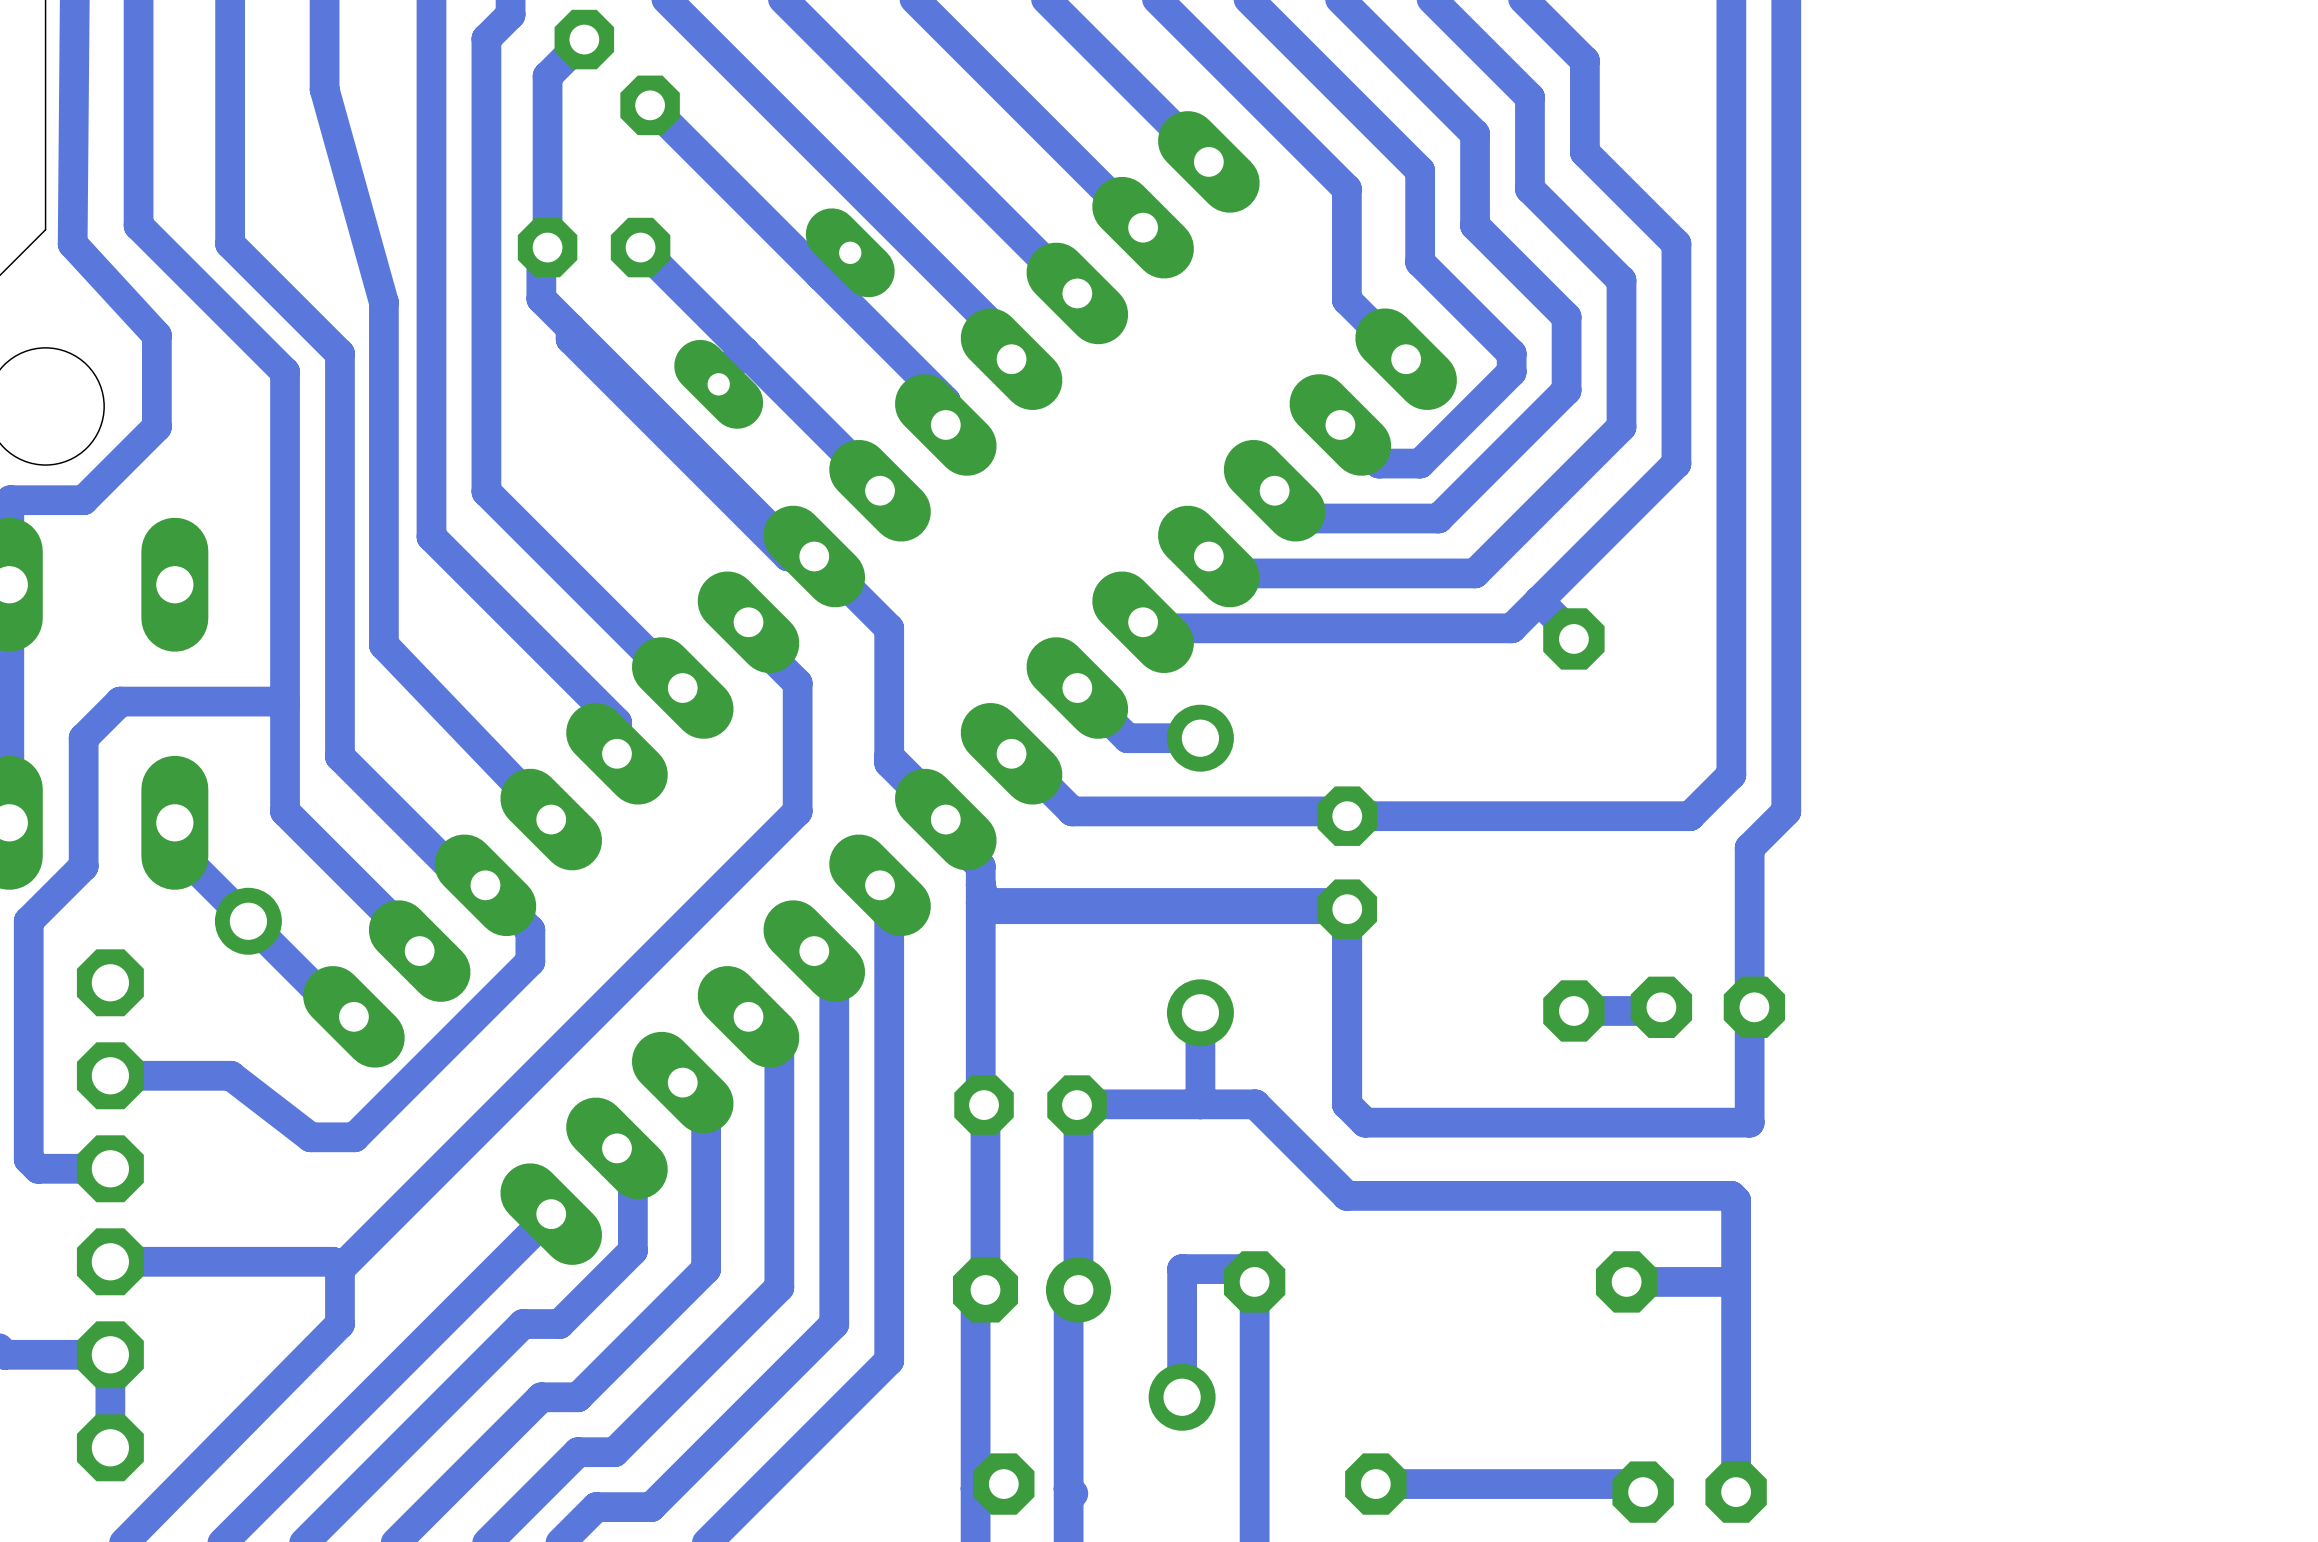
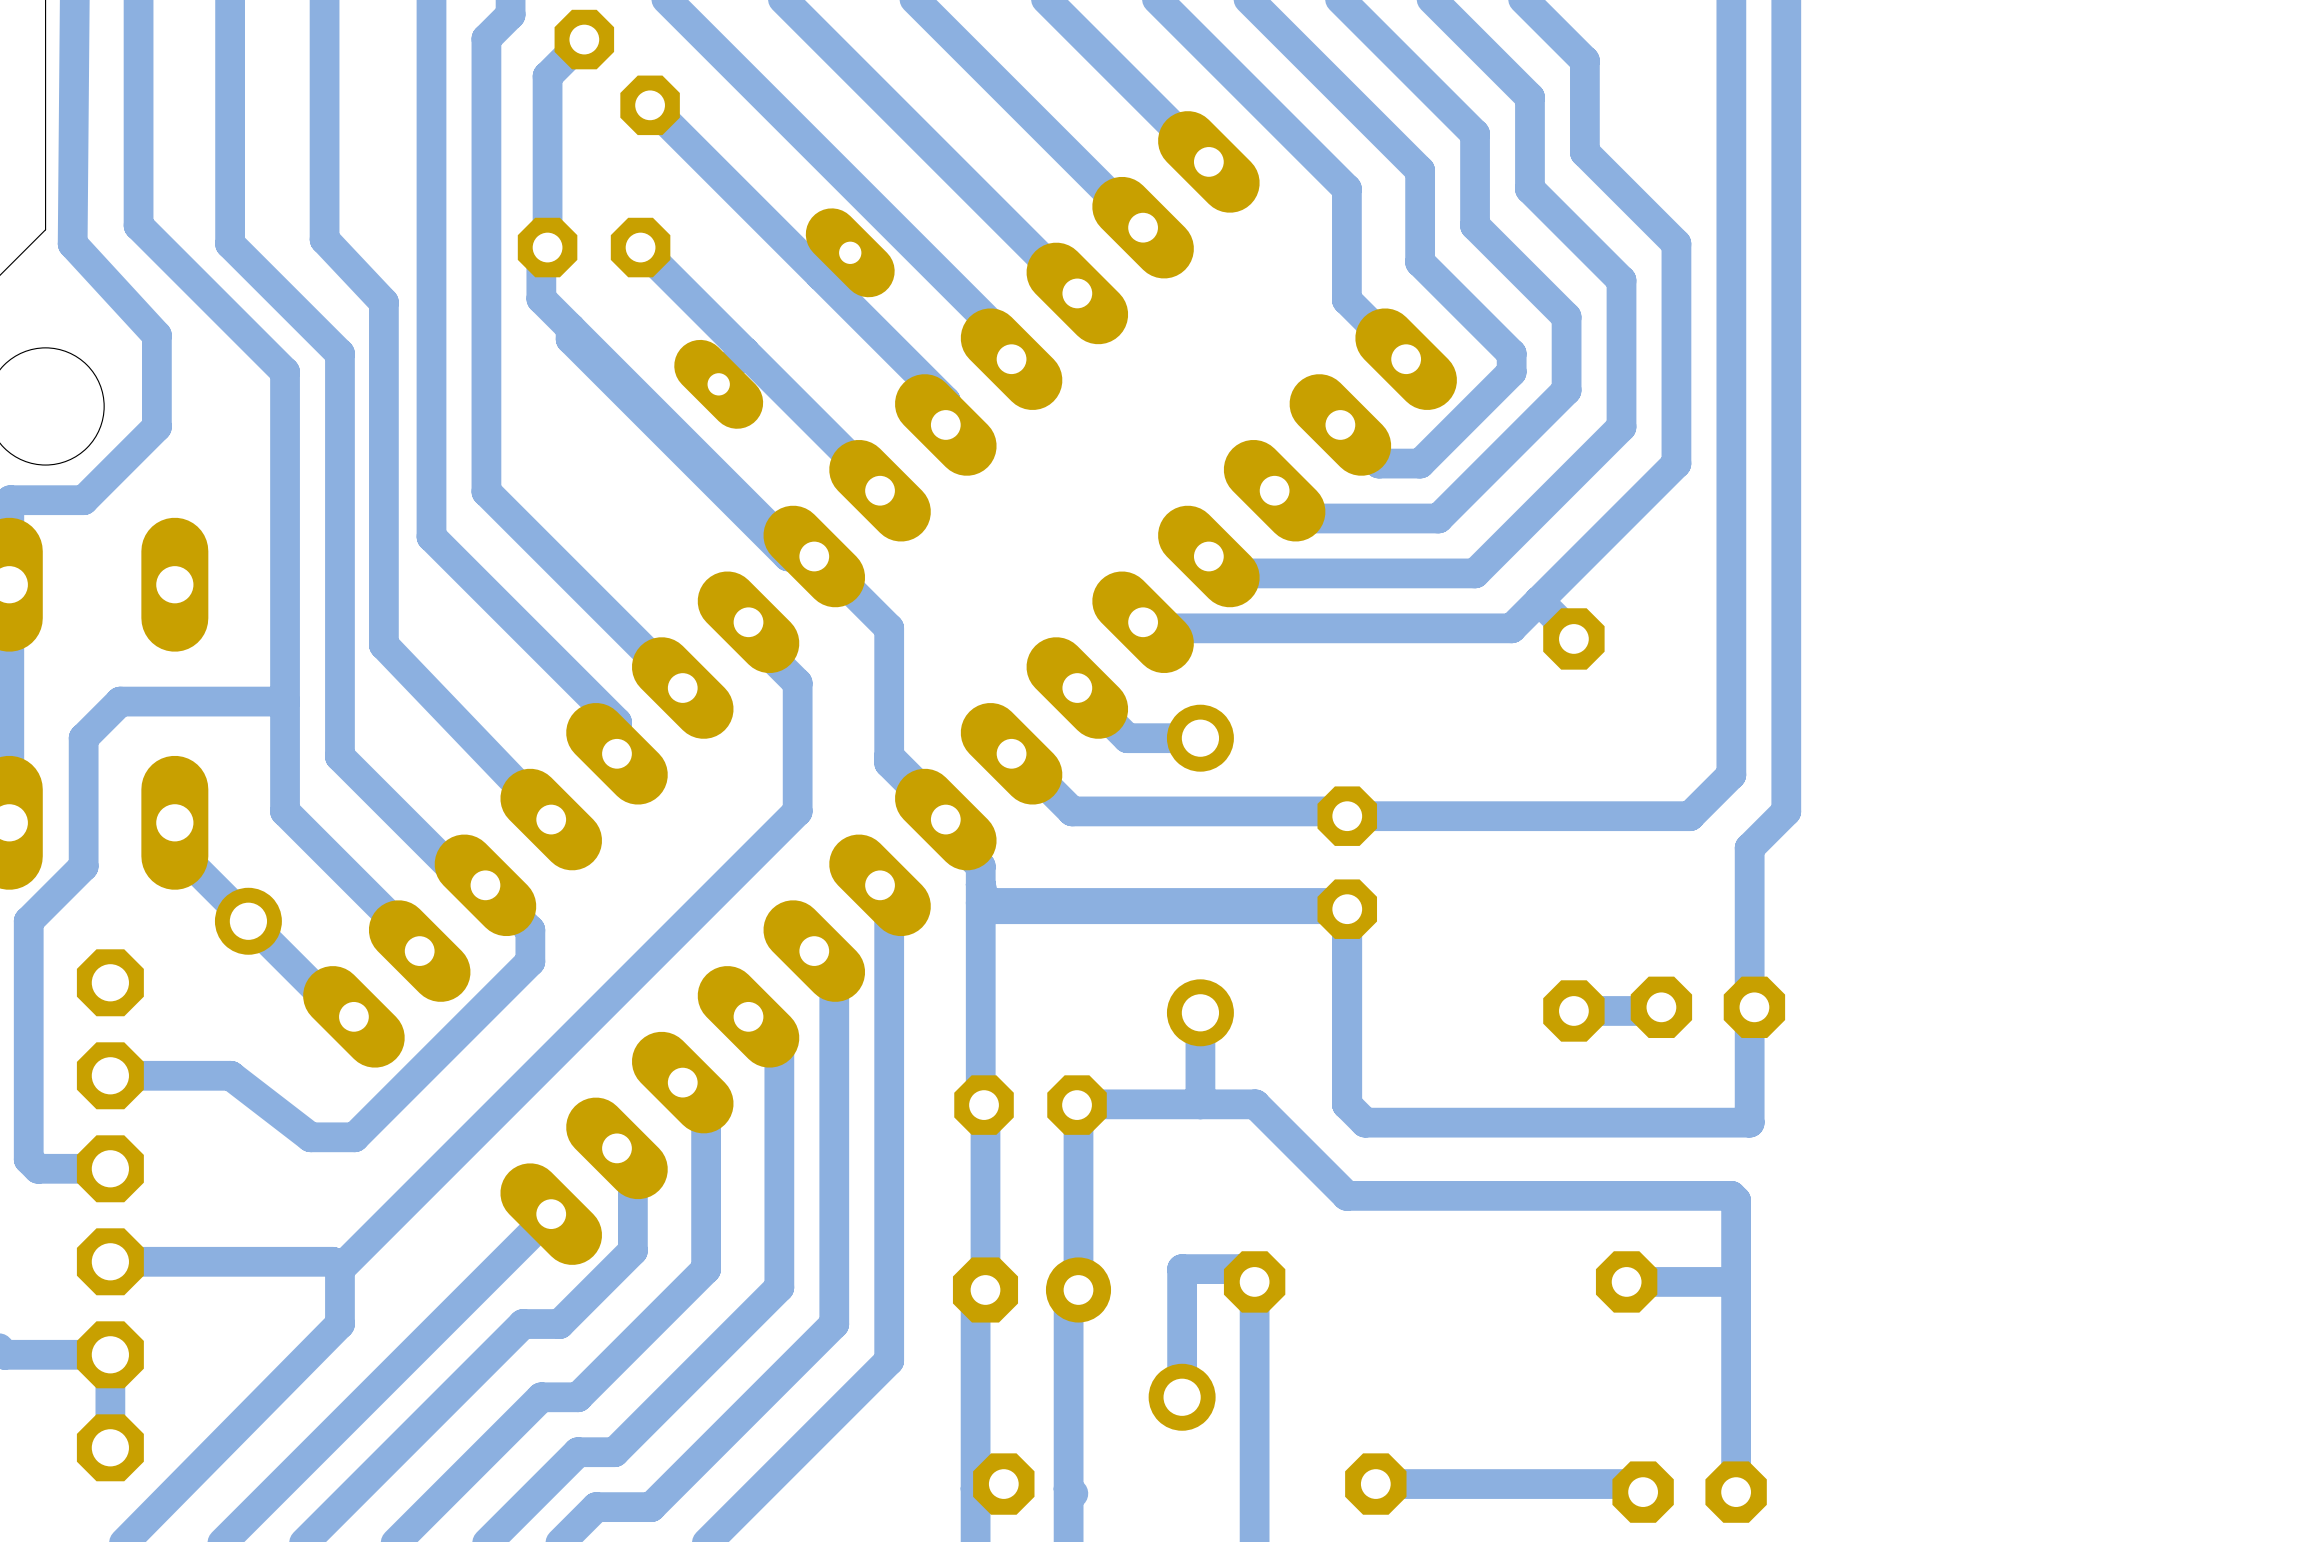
track: (324, 89) (383, 302) -> (324, 89) (324, 239) (383, 302)

